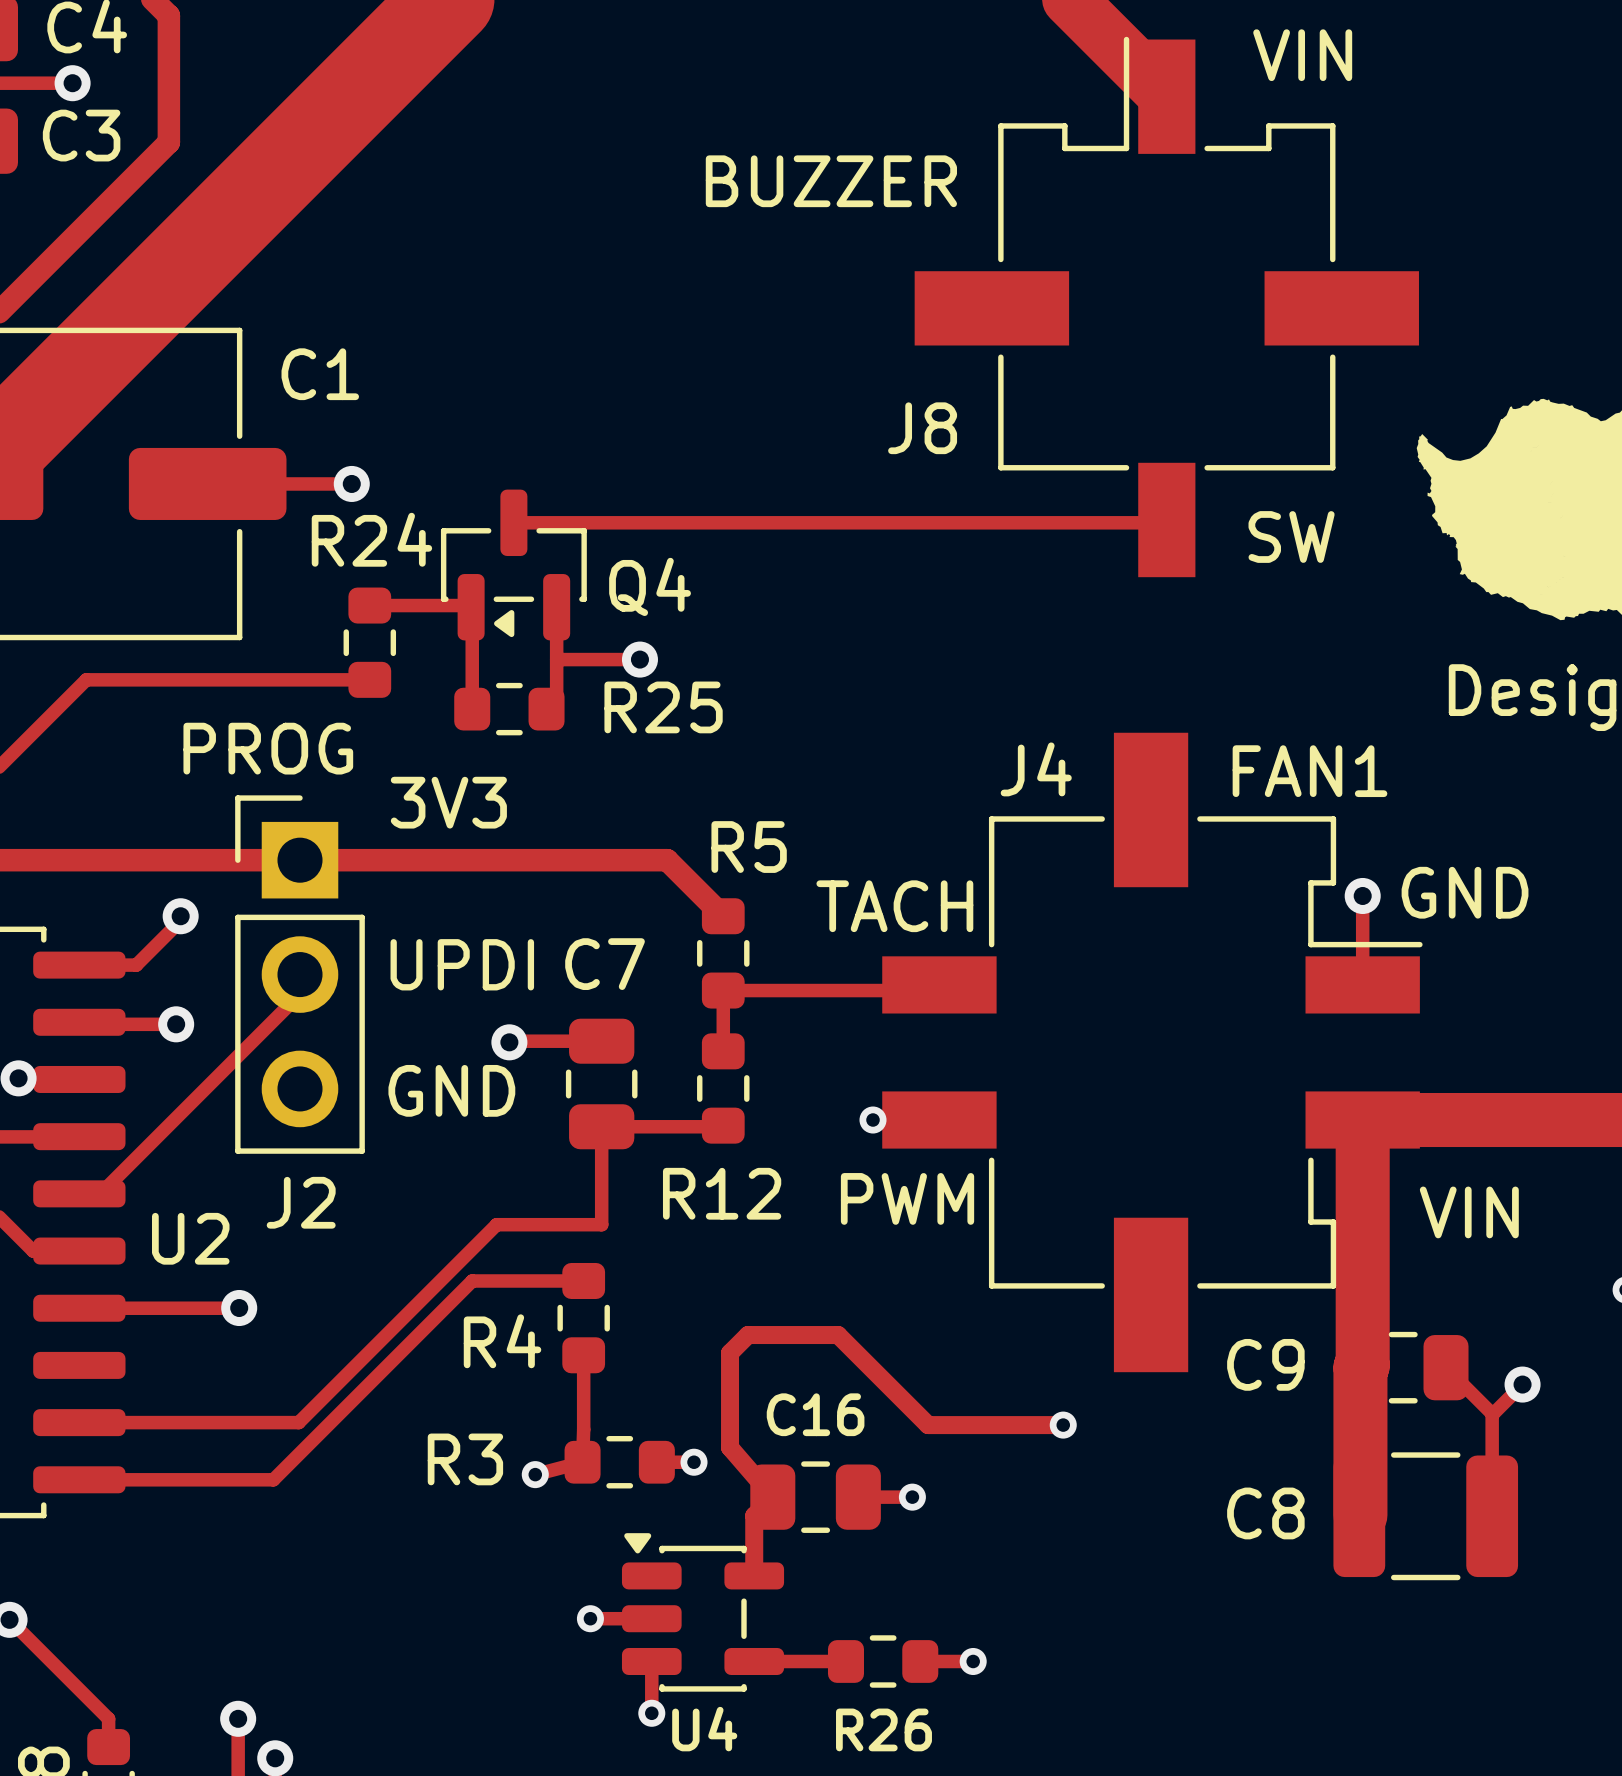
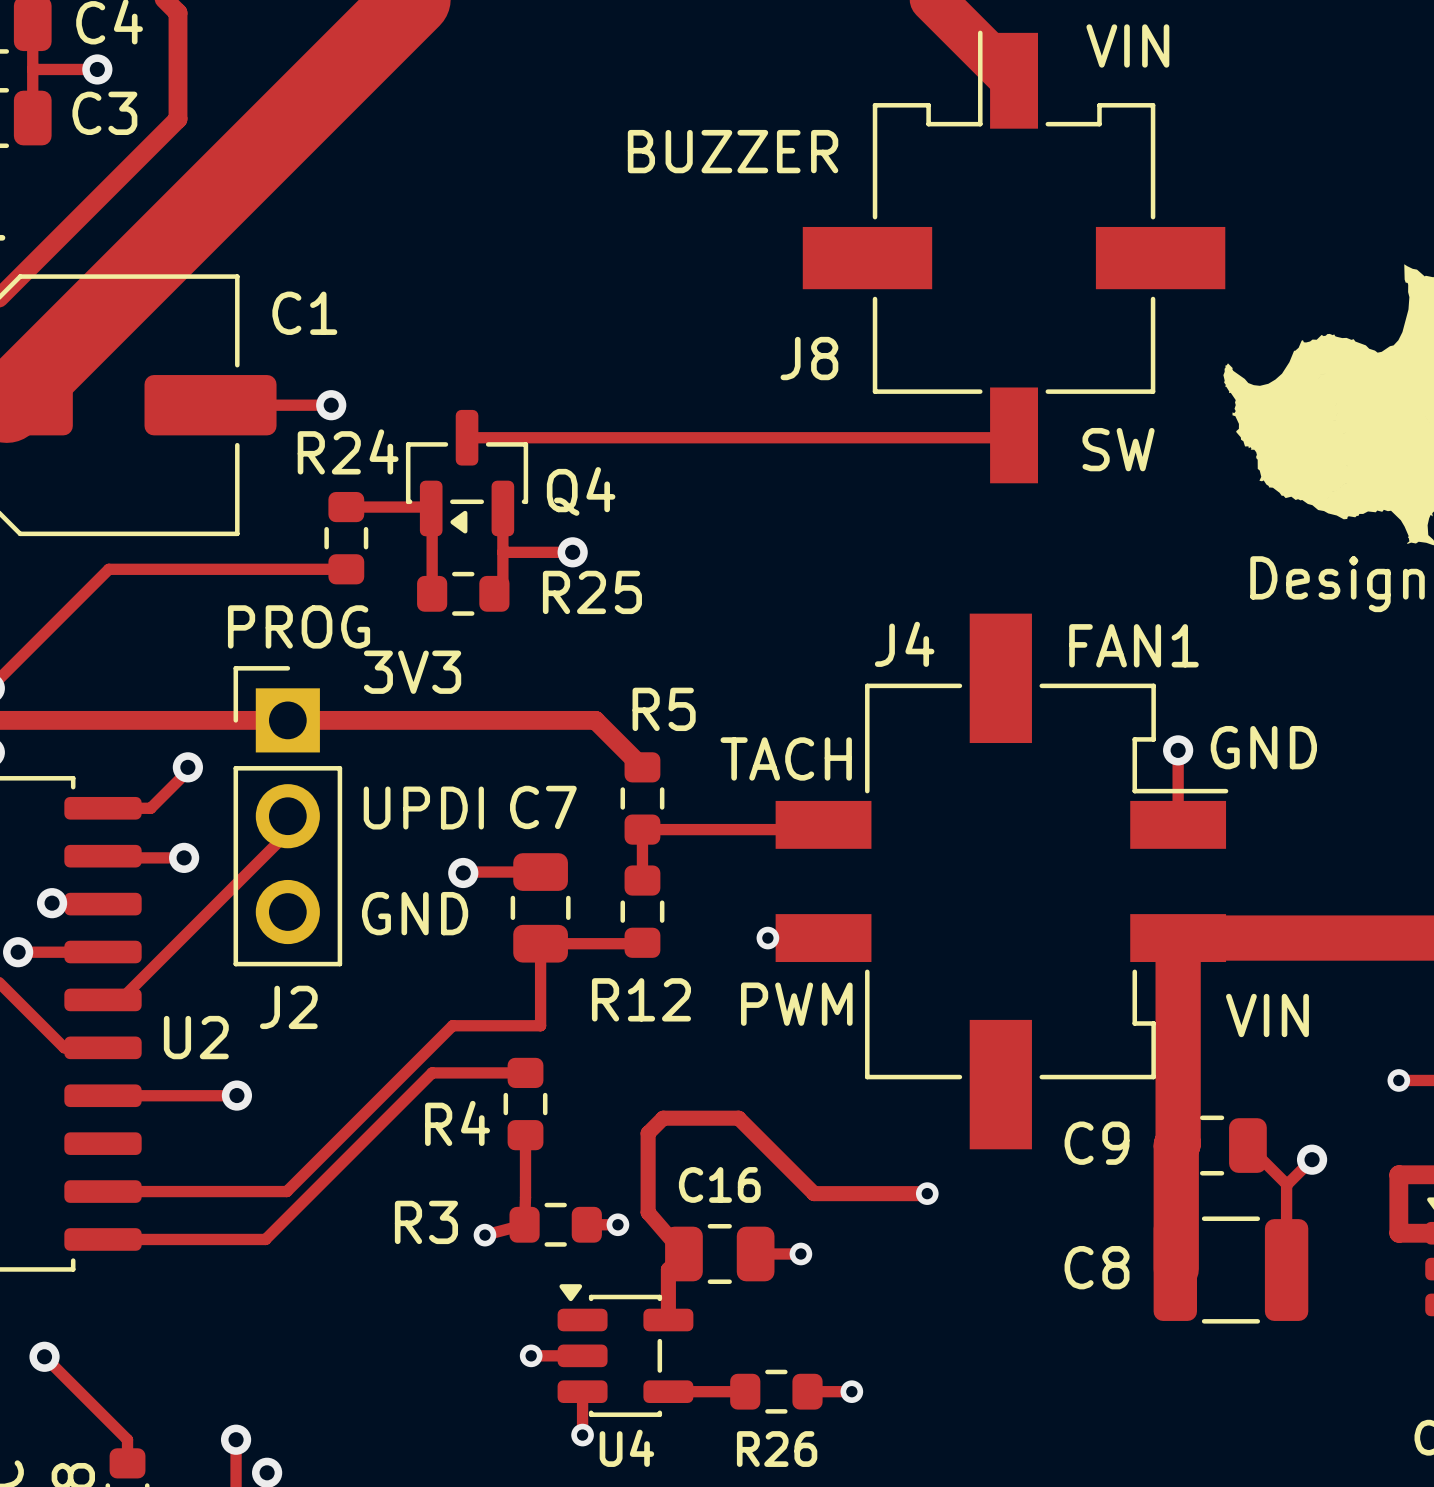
text position: PROG (268, 748) -> PROG (299, 626)

